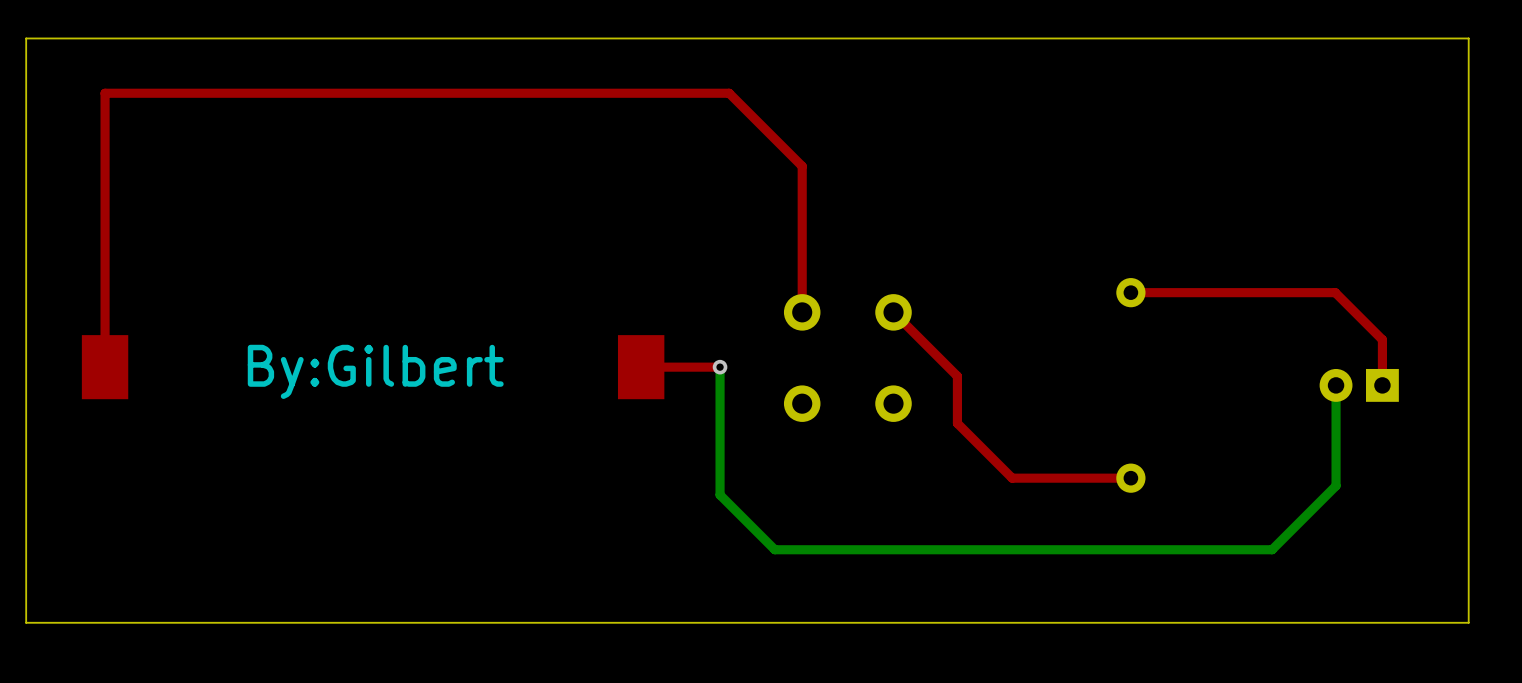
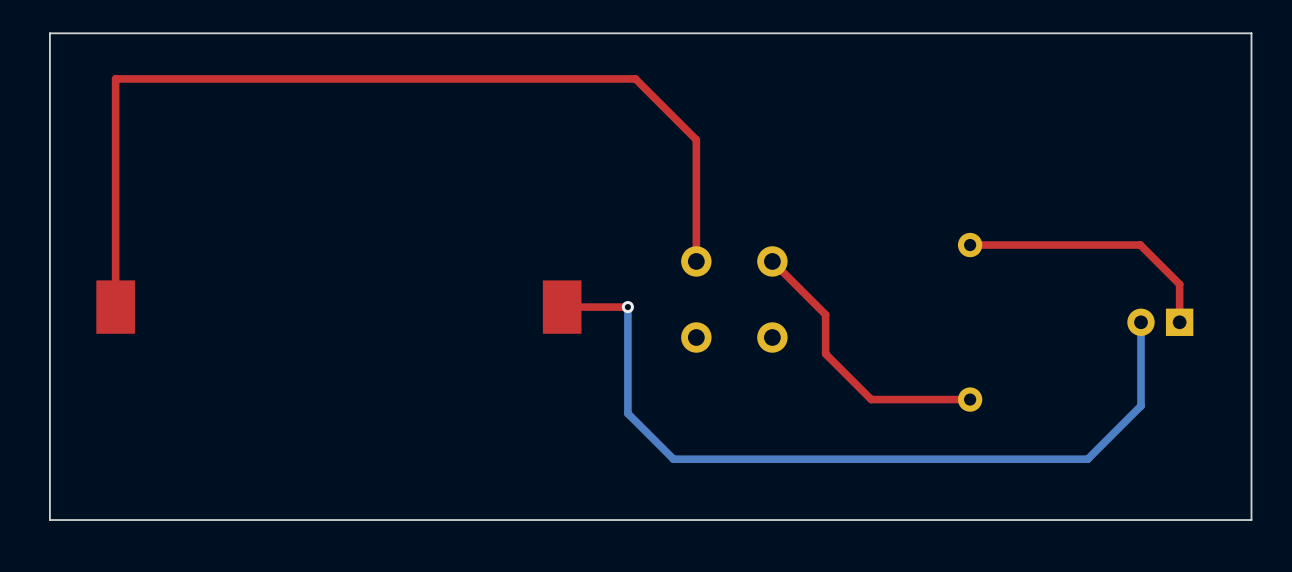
text: By:Gilbert (375, 371) -> none

